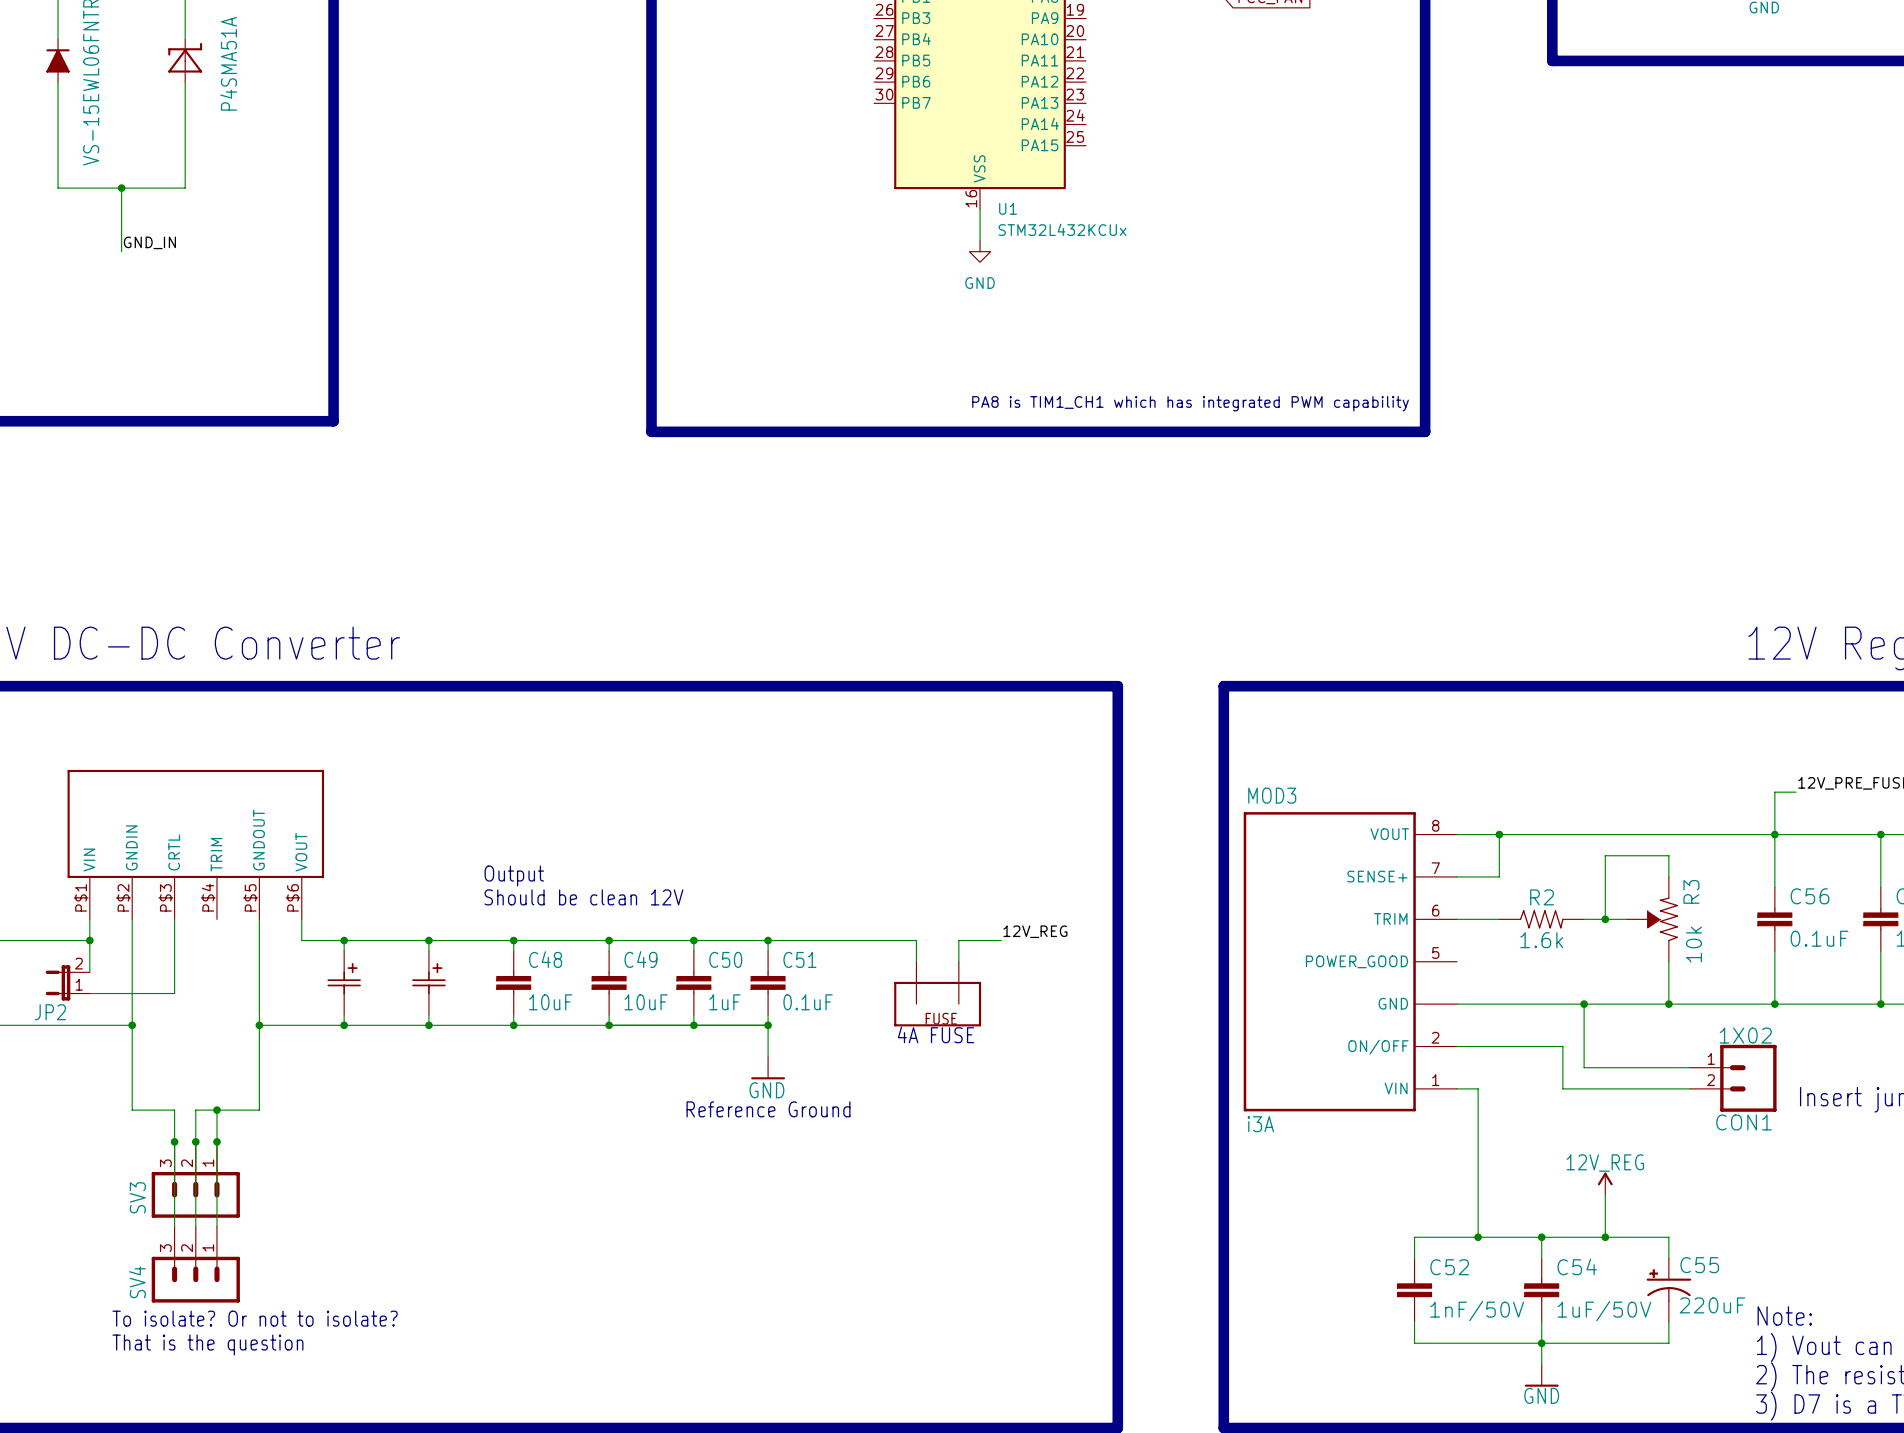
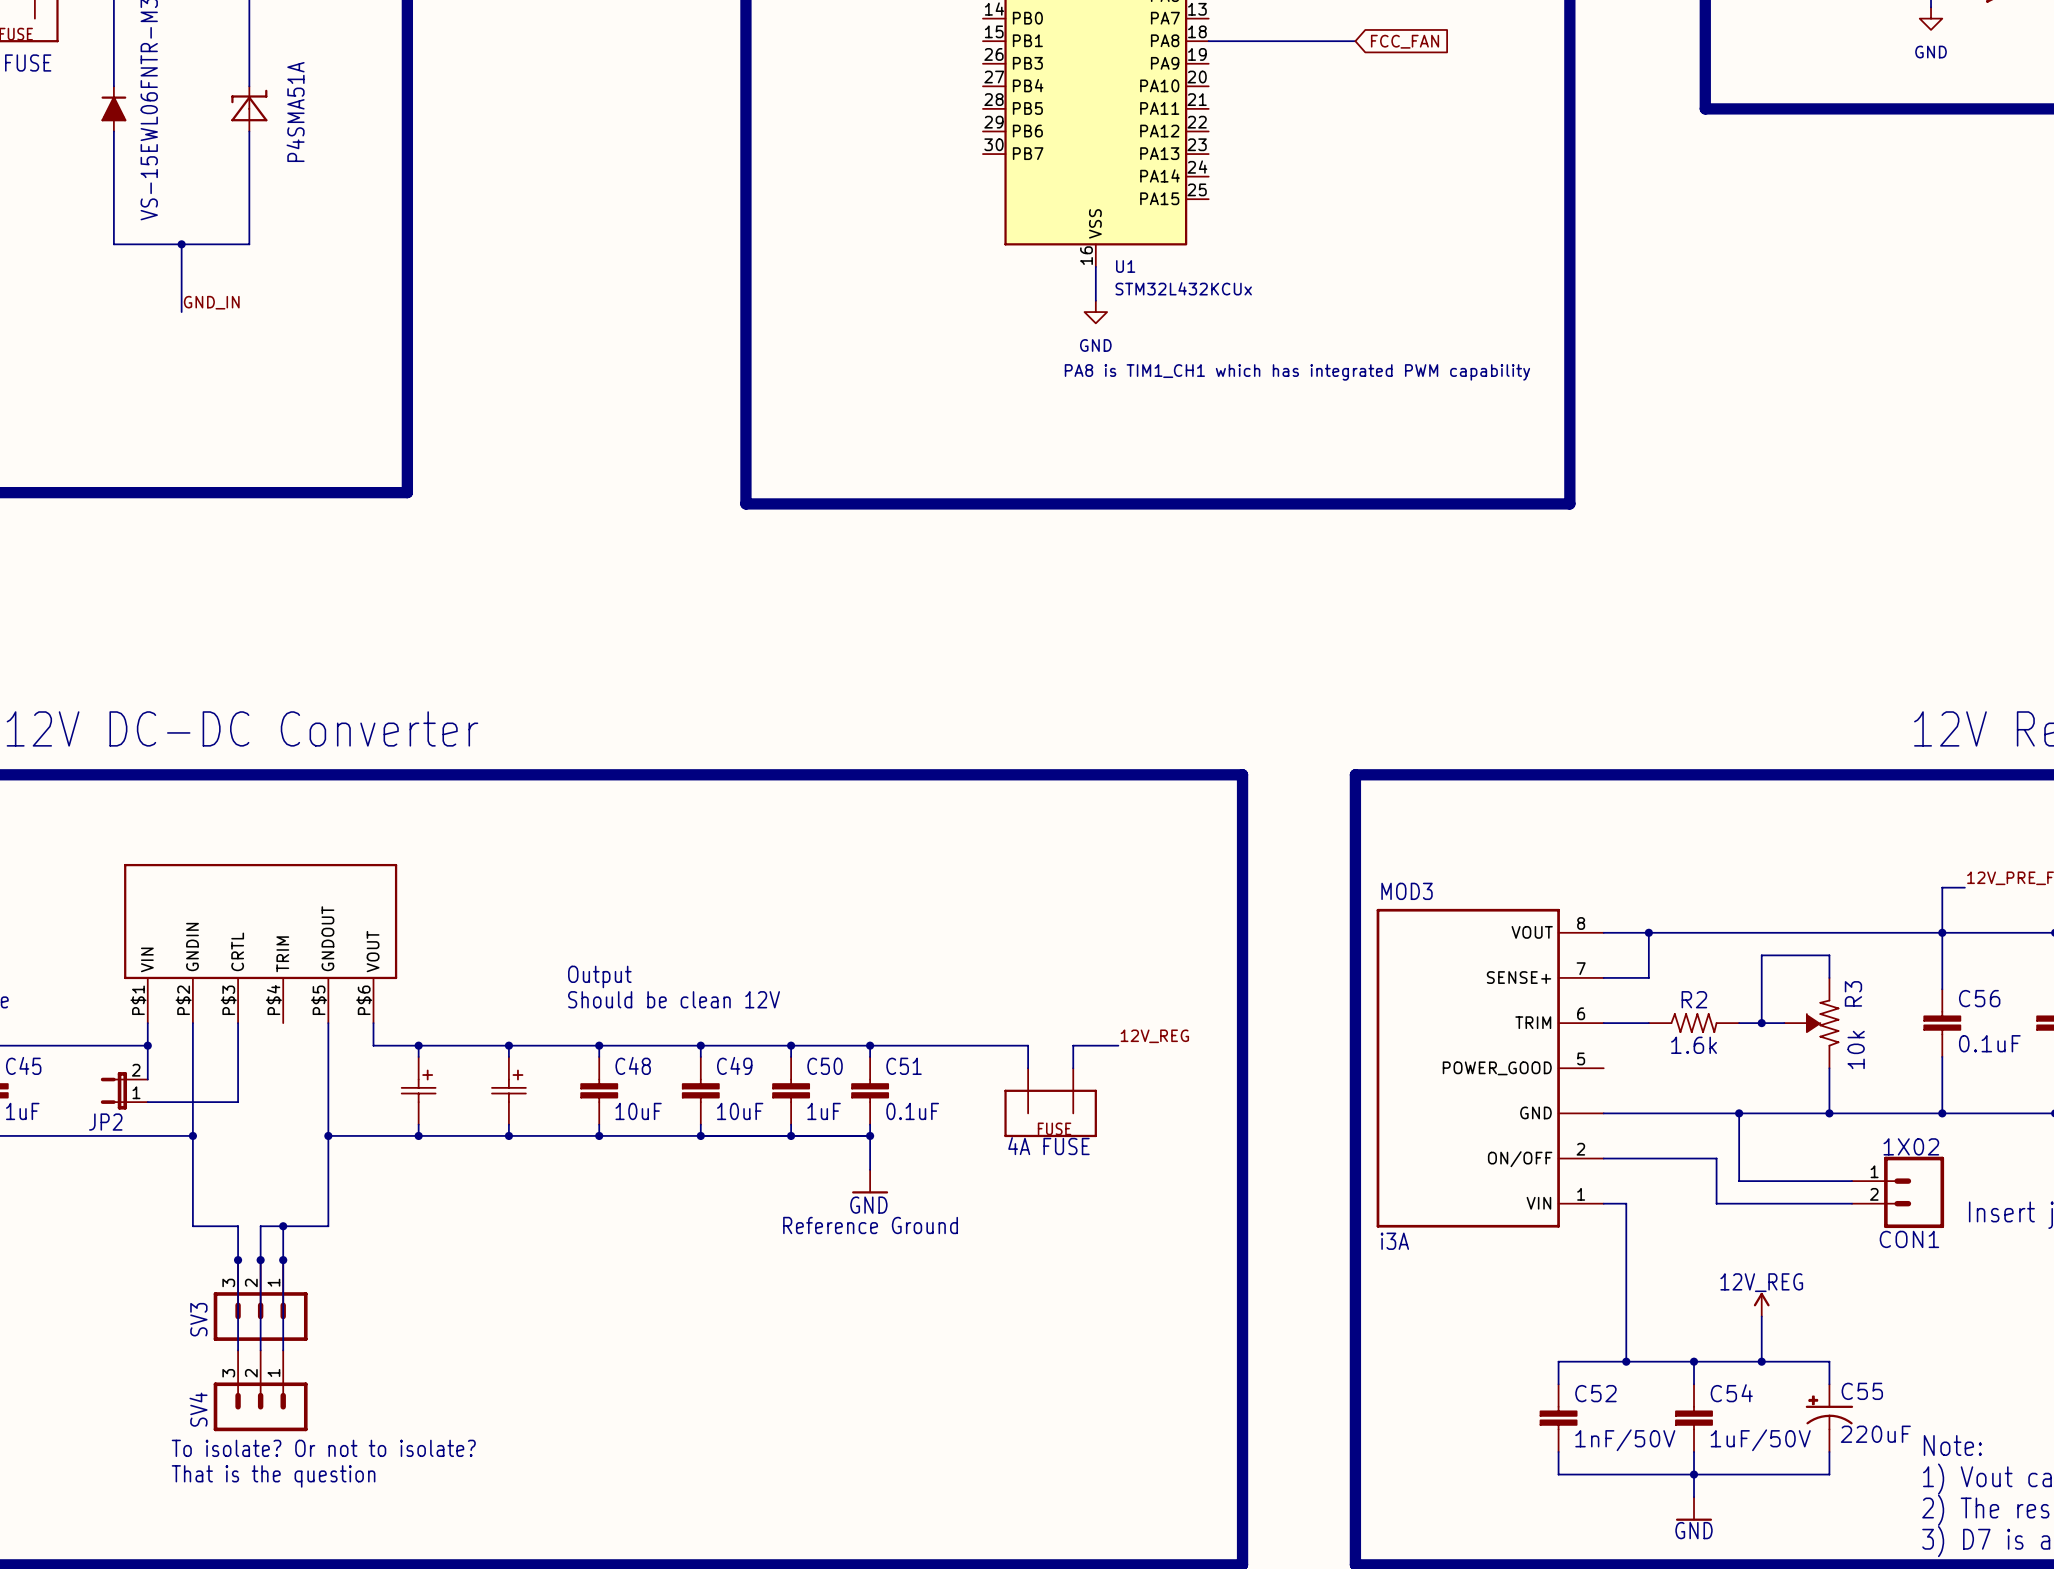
text position: PA8 is TIM1_CH1 which has integrated PWM capability (1190, 403) -> PA8 is TIM1_CH1 which has integrated PWM capability (1297, 372)

